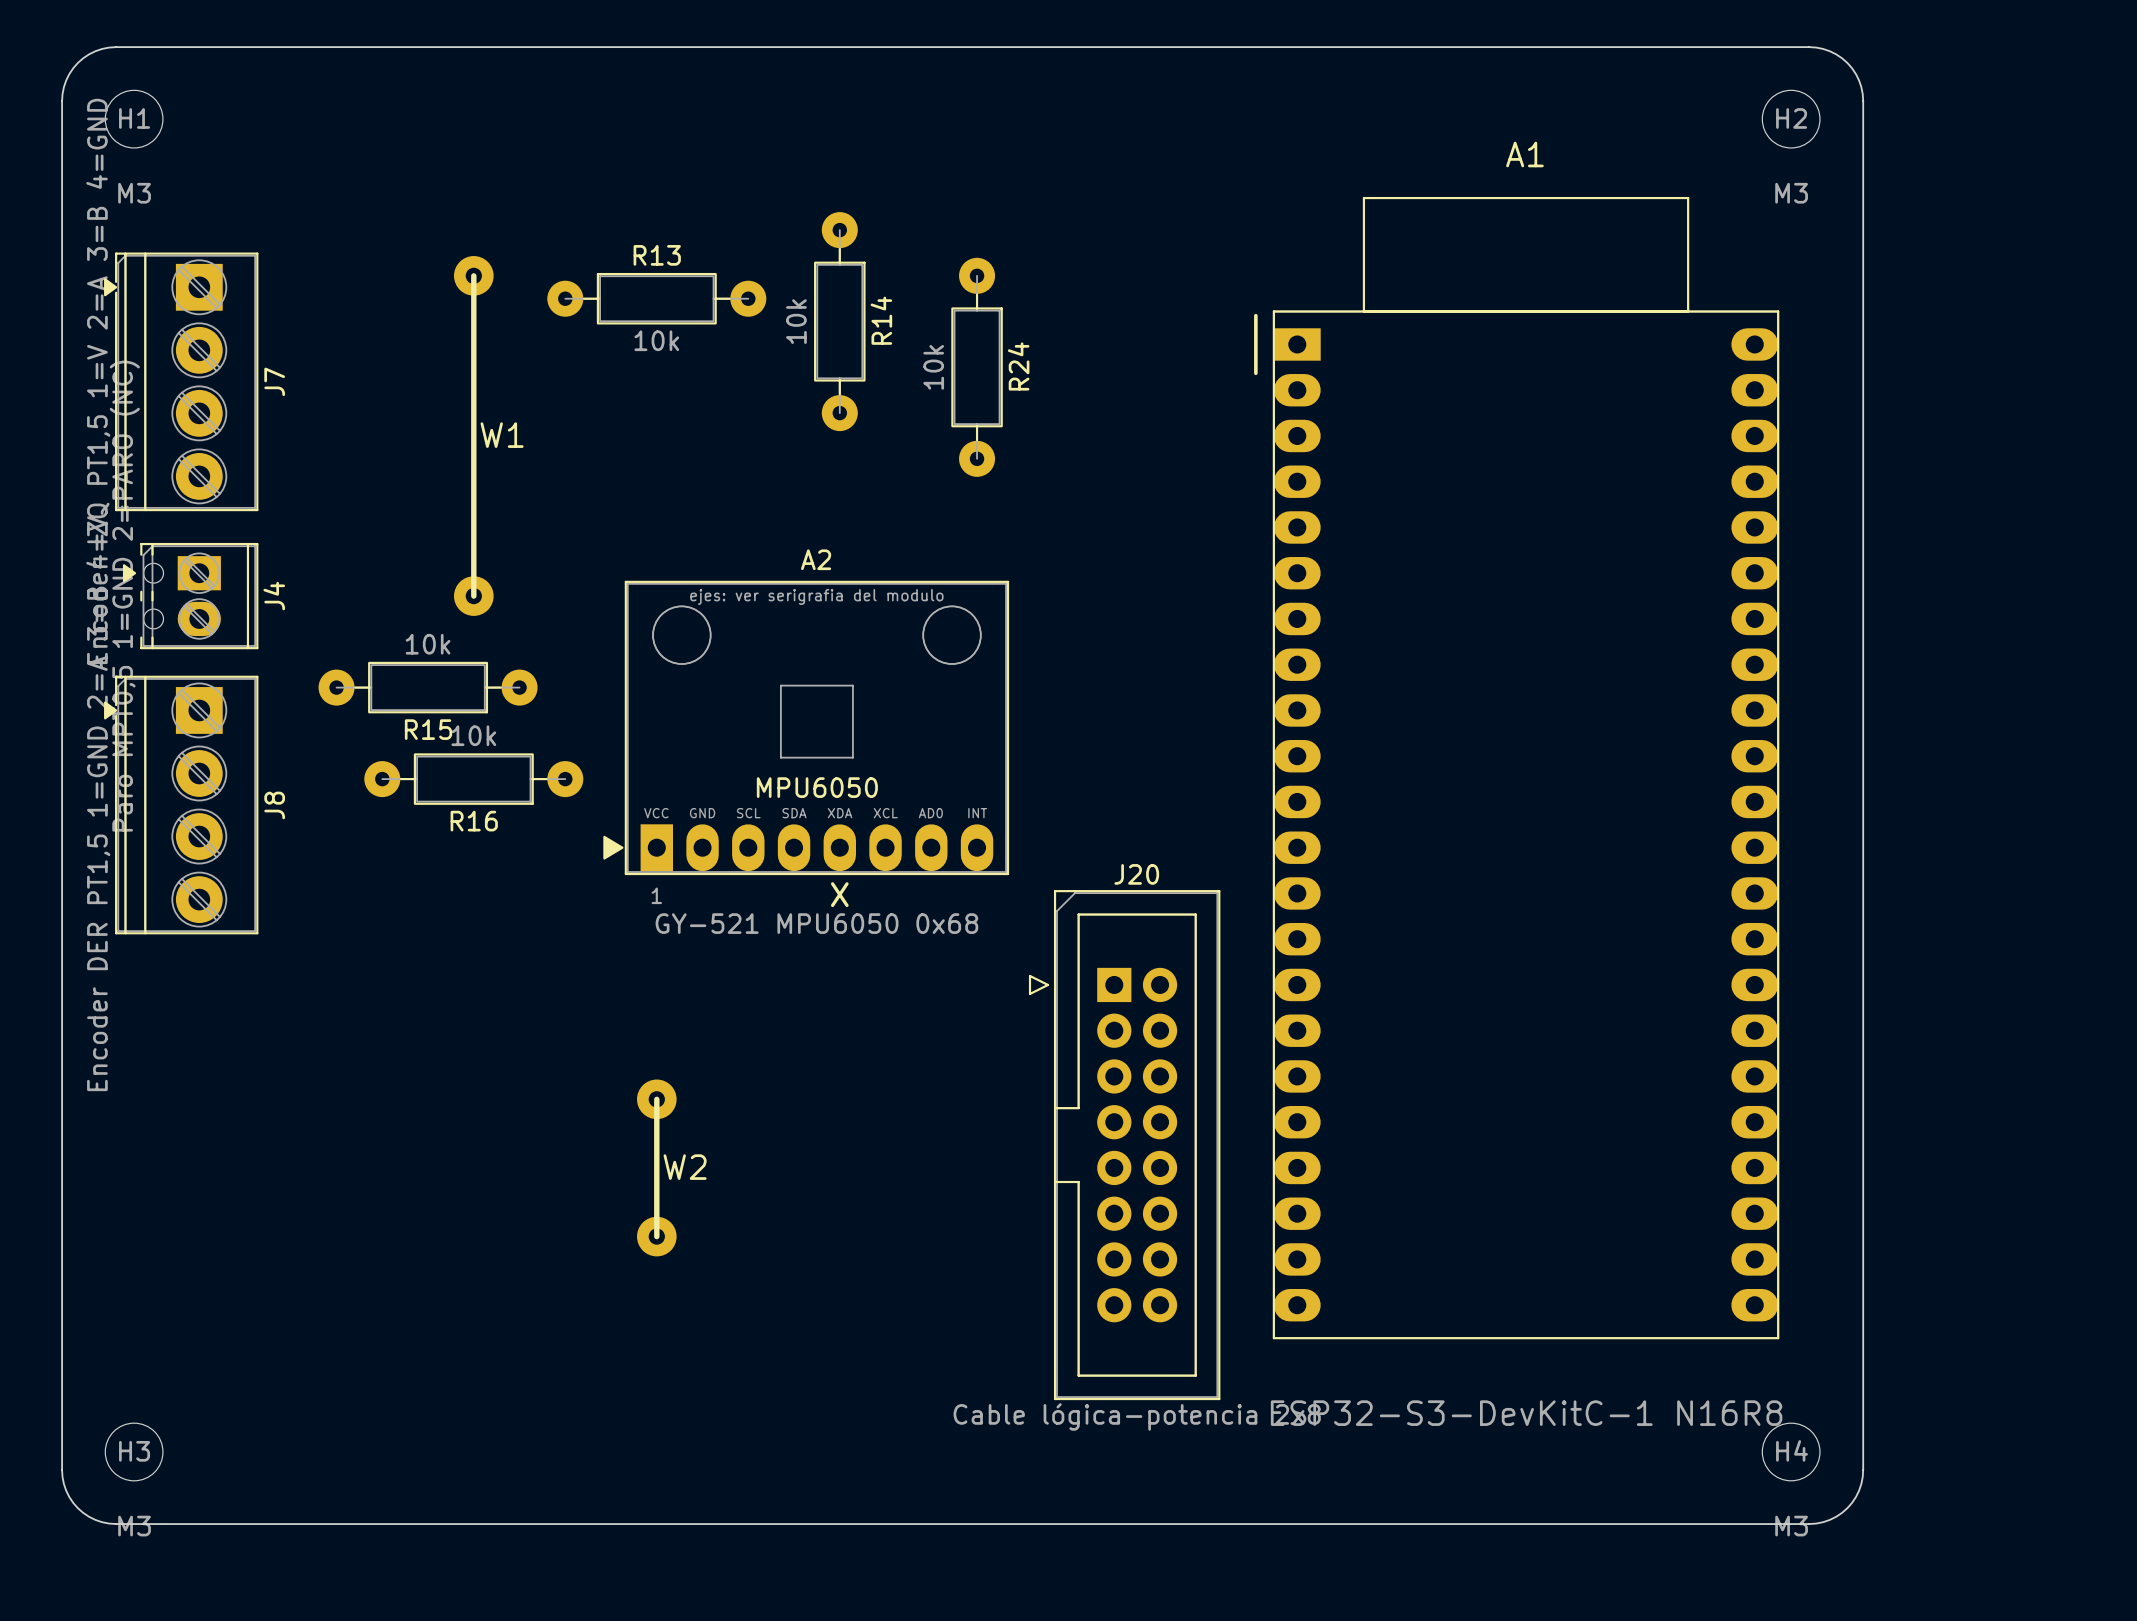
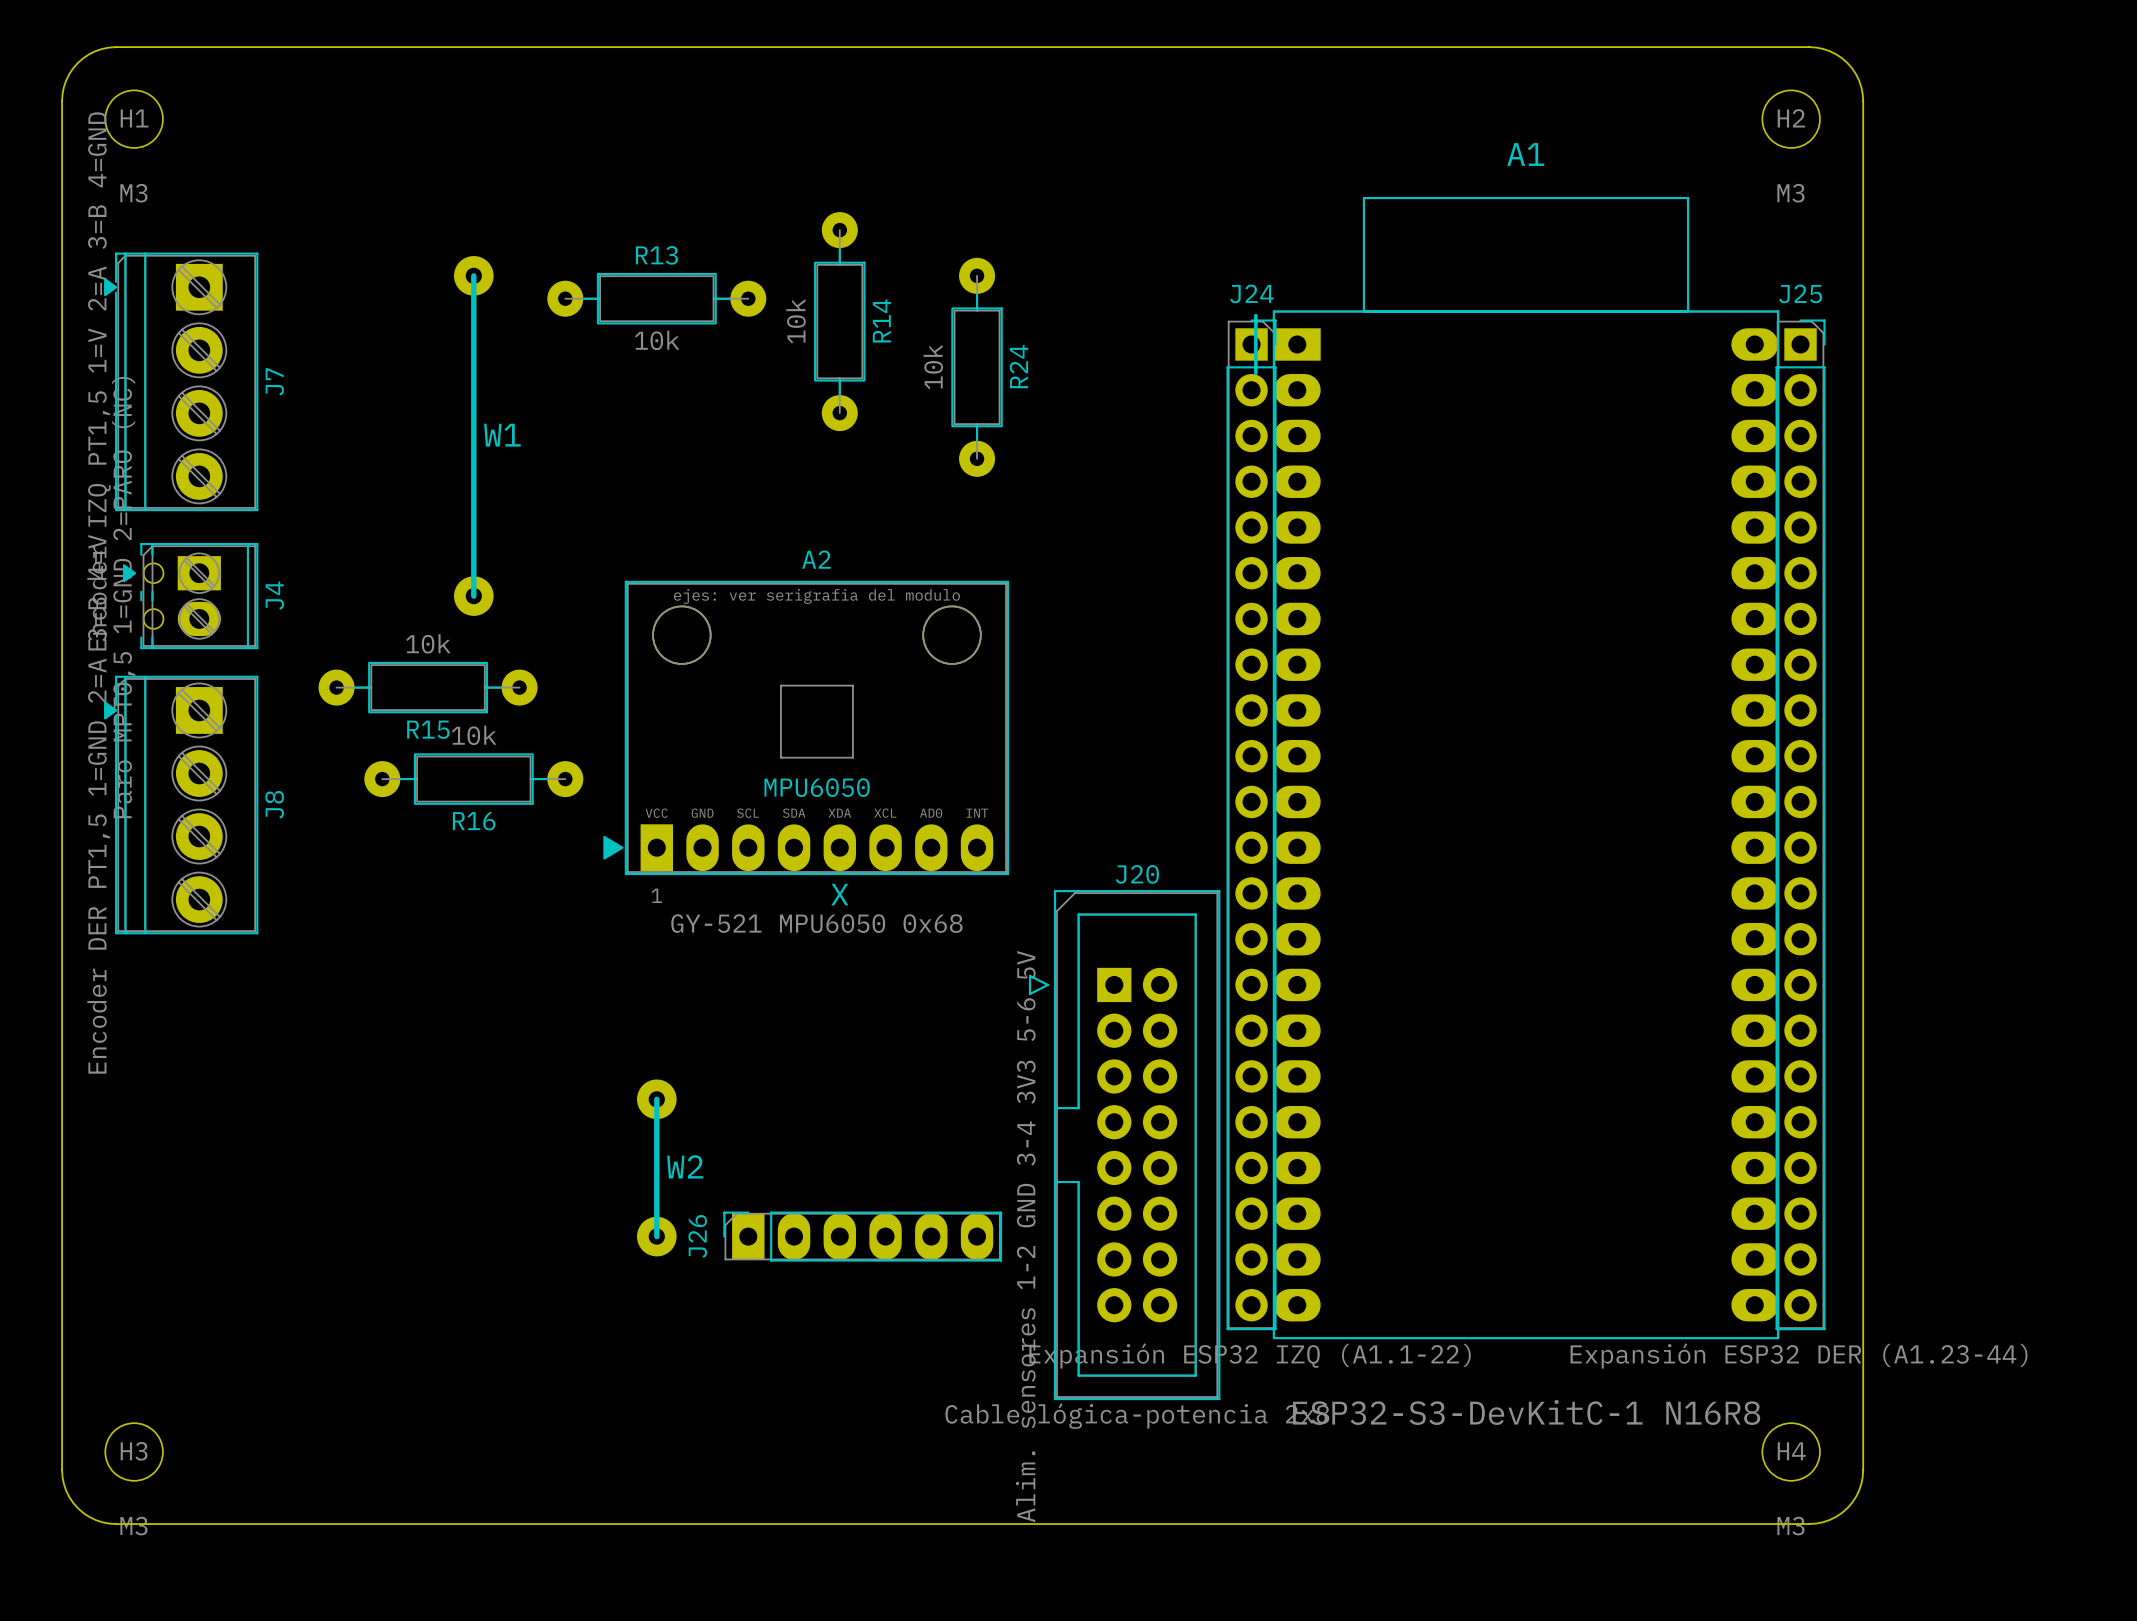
J24: none -> Expansión ESP32 IZQ (A1.1-22) (1251, 824)
J25: none -> Expansión ESP32 DER (A1.23-44) (1800, 824)
J26: none -> Alim. sensores 1-2 GND 3-4 3V3 5-6 5V (862, 1236)

